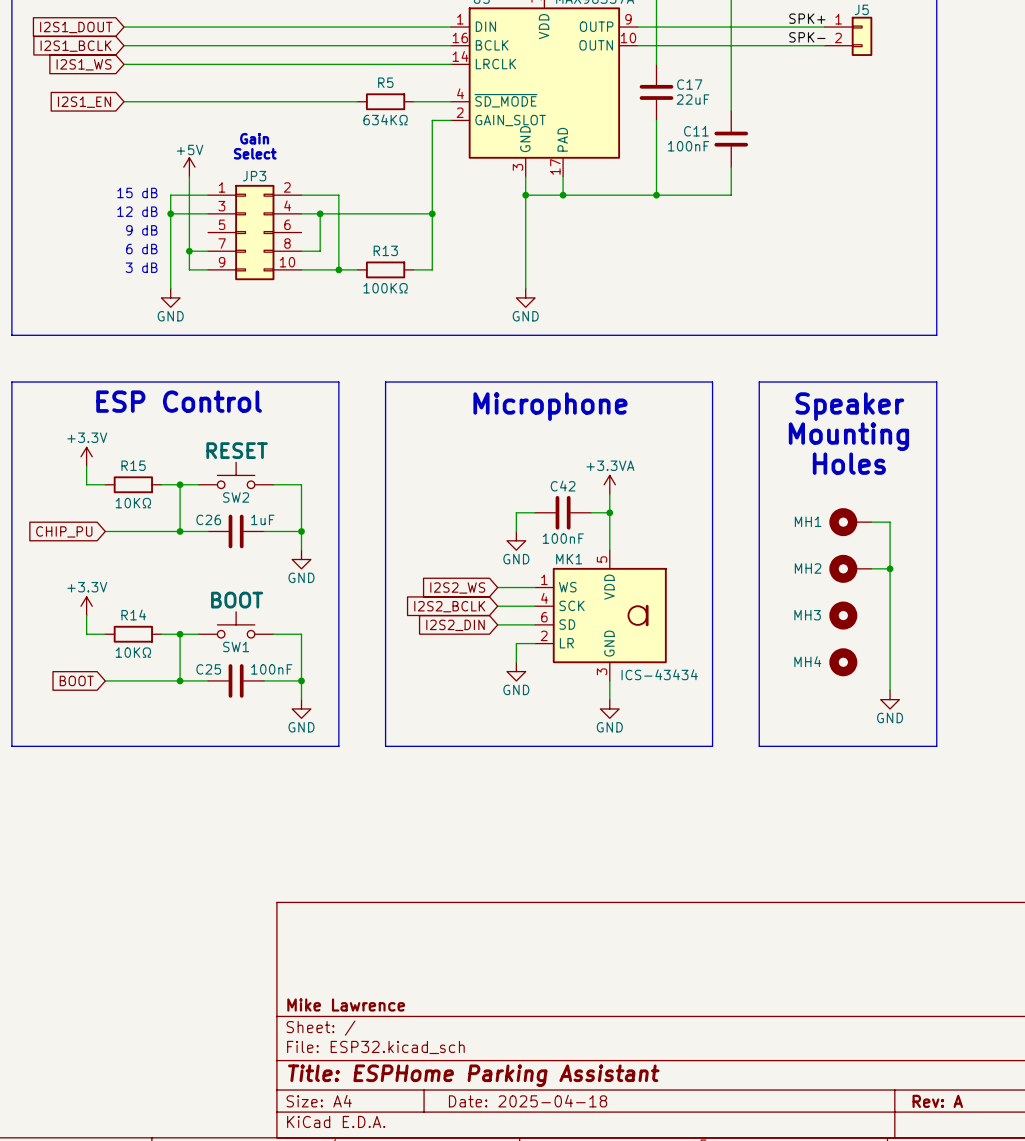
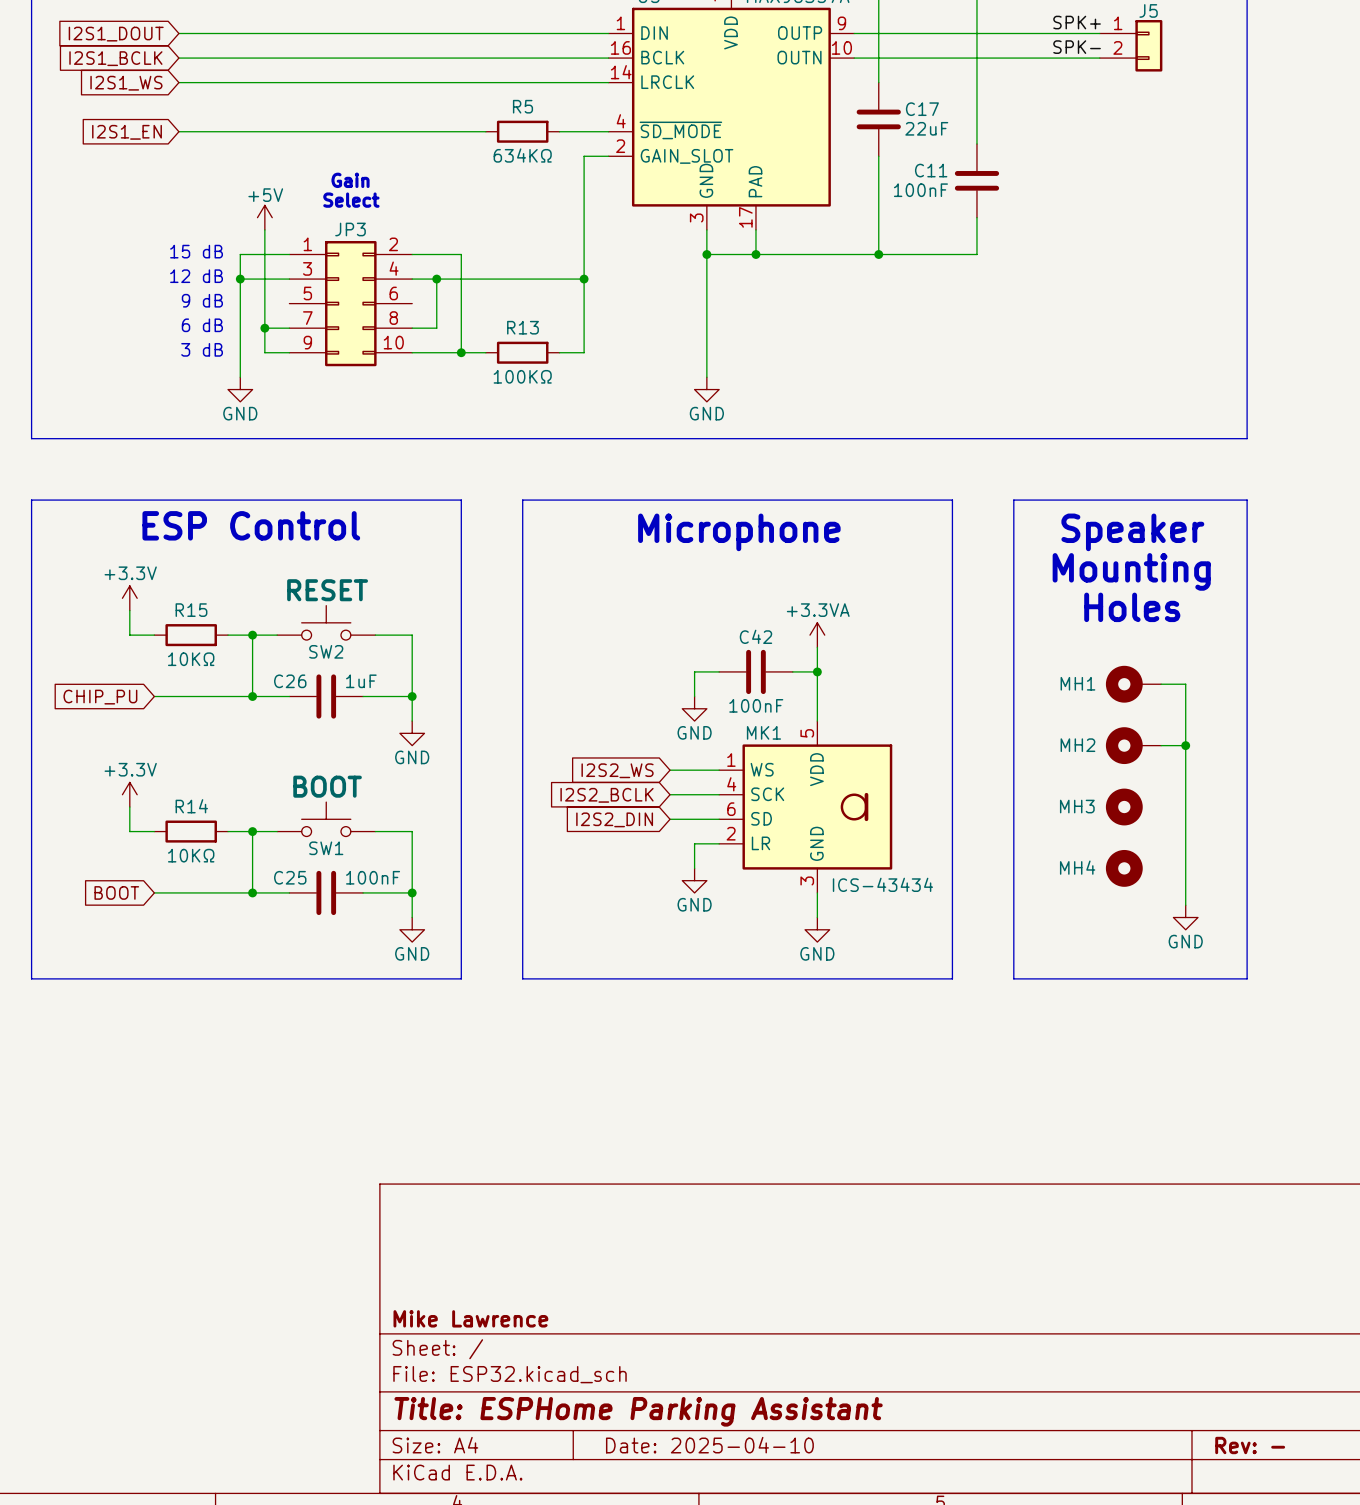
title block: Date: 2025-04-18 (528, 1101) -> Date: 2025-04-10 (709, 1445)
title block: Rev: A (937, 1101) -> Rev: - (1250, 1445)

